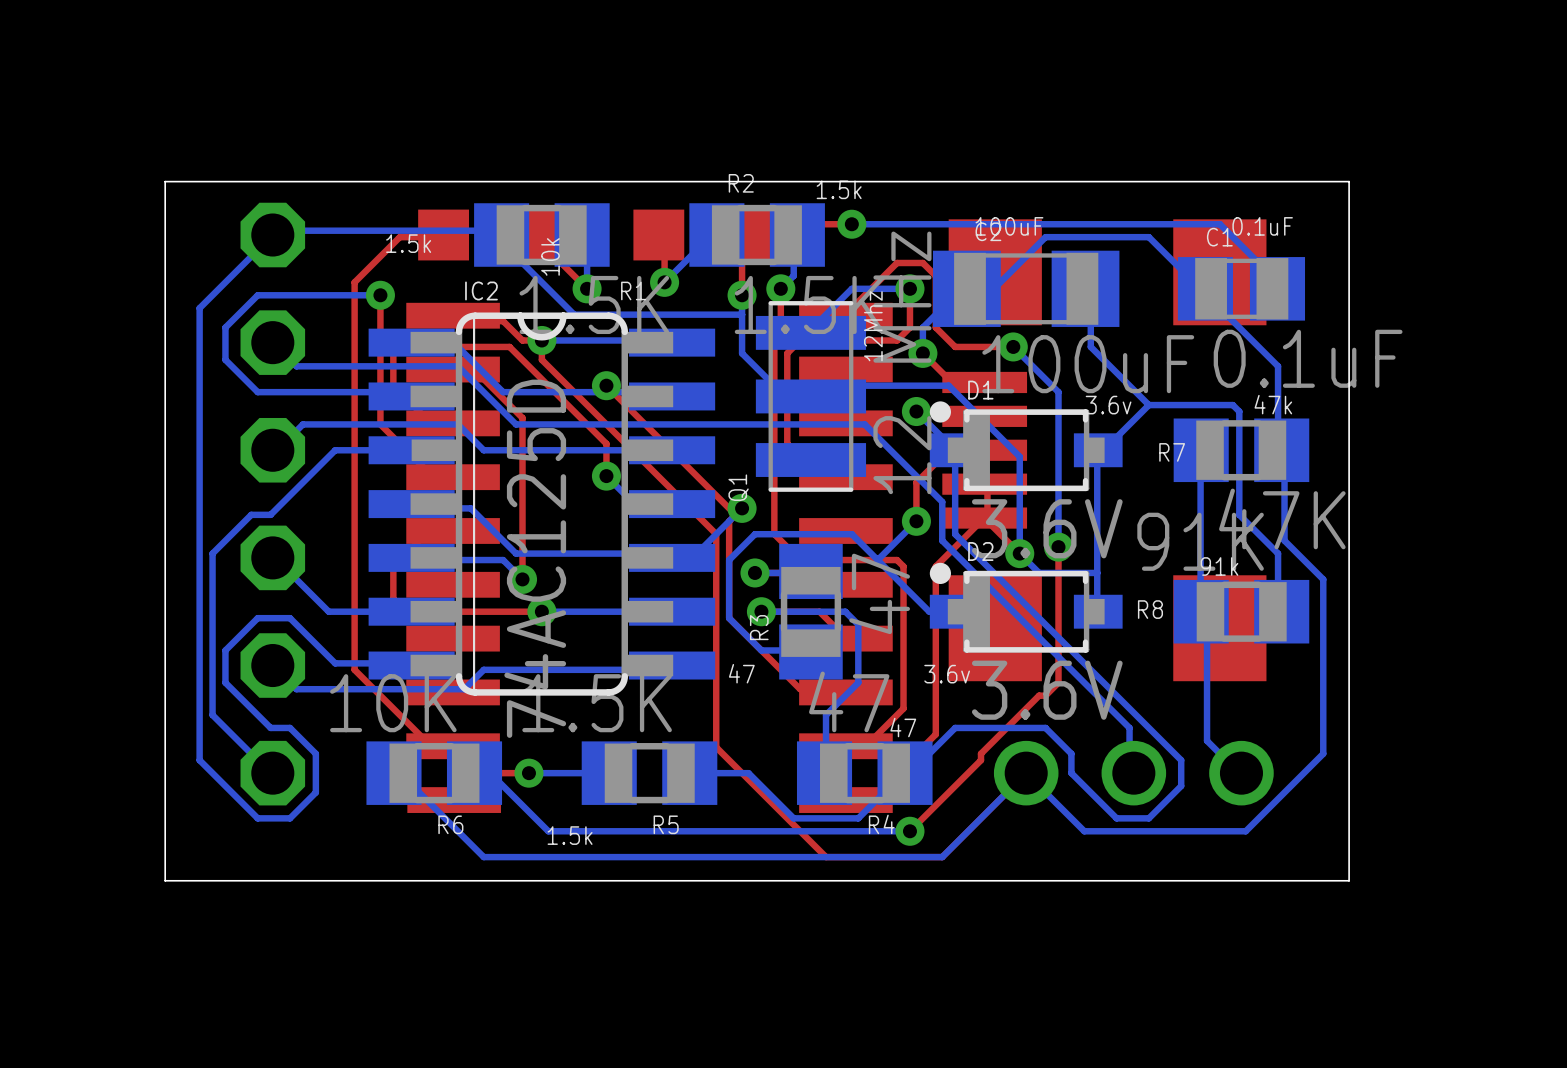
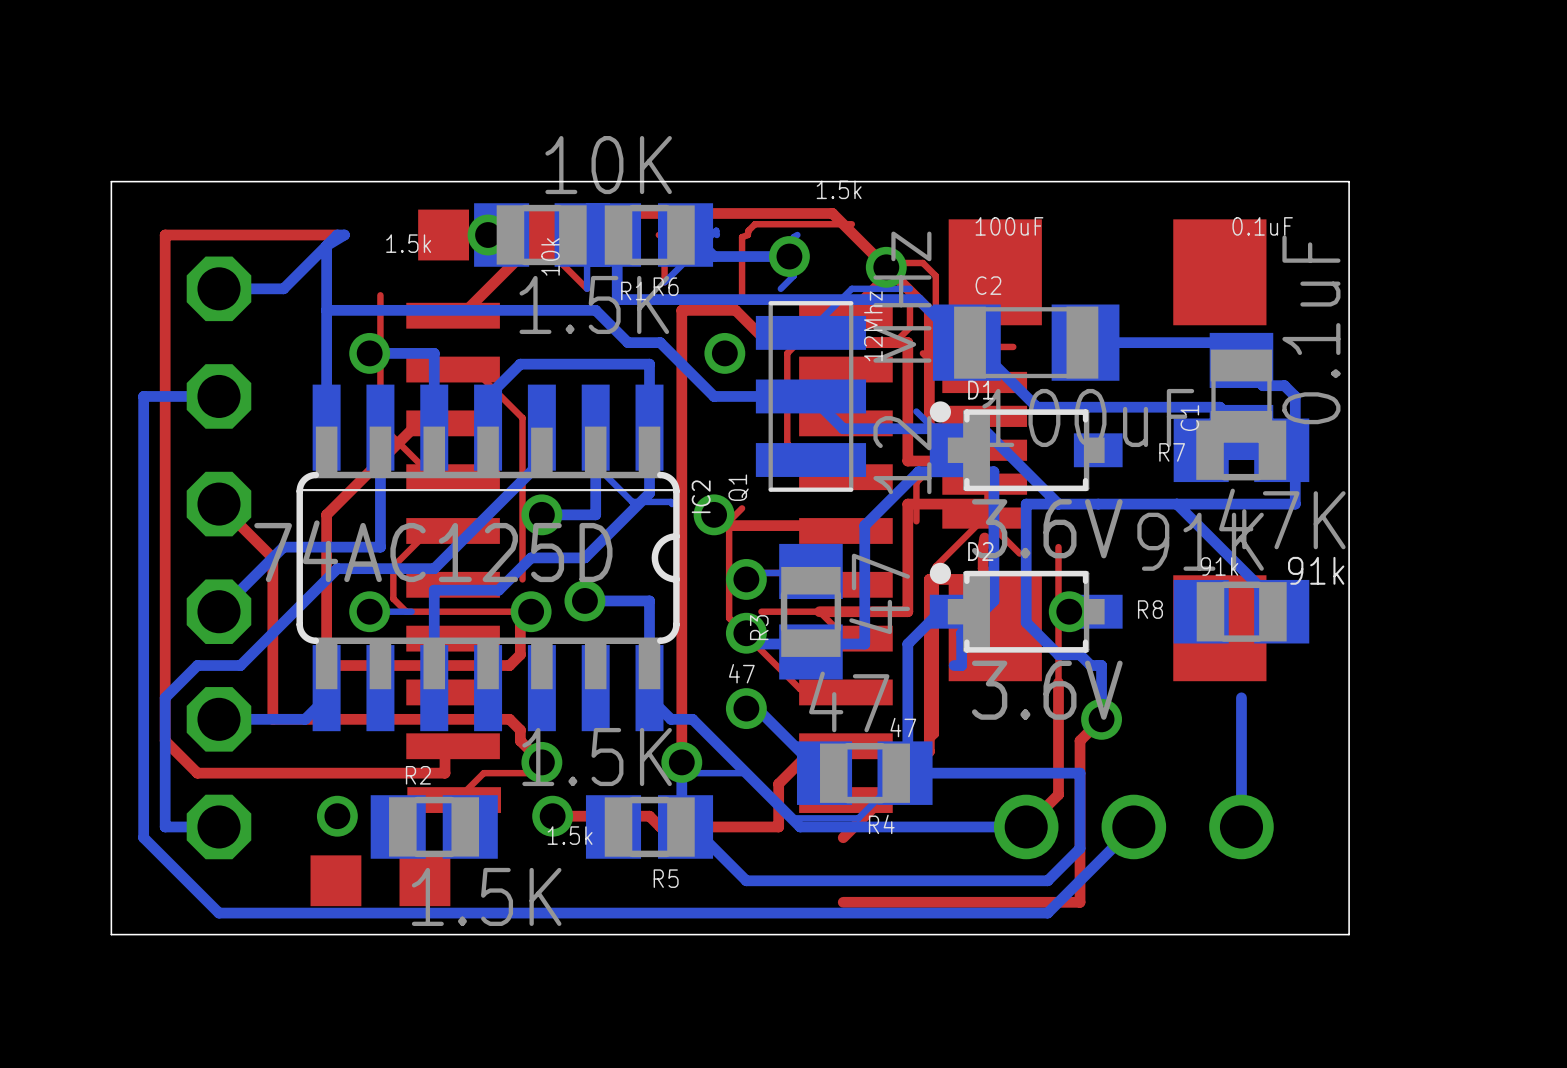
board edge: (165, 181) (165, 880) (1349, 880) -> (165, 181) (111, 181) (111, 934) (1349, 934) (1349, 880)
R2 footprint: [689, 203, 825, 267] -> [370, 795, 498, 859]
bottom track: (851, 224) (1219, 224) (1271, 275) (1271, 288) (1277, 288) -> none
via: (851, 224) -> none
top track: (443, 235) (438, 237) (399, 237) (354, 282) (354, 669) (425, 740) (451, 740) (453, 746) -> (335, 235) (165, 235) (165, 740) (197, 773) (445, 773) (445, 751) (453, 746)
via: none -> (488, 235)
bottom track: none -> (613, 235) (617, 235) (617, 299) (918, 299) (961, 342) (972, 342) (1036, 407) (1219, 407) (1241, 428) (1241, 432)
bottom track: none -> (685, 235) (692, 235) (714, 256) (789, 256)
part position: (703, 235) -> (380, 880)
via: (664, 282) -> none
bottom track: none -> (218, 288) (283, 288) (337, 235) (344, 235) (326, 245) (326, 427)
via: (587, 288) -> none
top track: (780, 288) (780, 340) (774, 346) (774, 534) (800, 560) (897, 560) (903, 566) (903, 708) (871, 740) (851, 740) (845, 746) -> (552, 816) (649, 816) (660, 826) (778, 826) (778, 783) (810, 751) (843, 751) (845, 746)
via position: (780, 288) -> (789, 256)
via position: (909, 288) -> (886, 267)
C2 position: (1026, 288) -> (1026, 342)
bottom track: (1085, 288) (1090, 288) (1090, 346) (1148, 405) -> none
C1 rotation: 0° (1241, 288) -> 90° clockwise (1241, 396)
C1 position: (1241, 288) -> (1241, 396)
bottom track: (380, 295) (257, 295) (225, 327) (225, 359) (257, 392) (406, 392) (411, 396) -> none
via: (380, 295) -> none
bottom track: (742, 295) (742, 353) (780, 392) (806, 392) (810, 396) (819, 385) (948, 385) (1019, 456) (1019, 553) (1039, 572) (1097, 572) -> none
via: (742, 295) -> none
bottom track: none -> (326, 310) (595, 310) (627, 342) (660, 342) (714, 396) (810, 396) (843, 428) (983, 428) (1058, 504)
bottom track: (742, 314) (574, 314) (496, 237) (501, 235) (496, 230) (277, 230) (199, 308) (199, 760) (257, 818) (290, 818) (315, 792) (315, 753) (290, 727) (270, 727) (225, 682) (225, 650) (257, 618) (290, 618) (335, 663) (406, 663) (411, 665) -> none
top track: (453, 315) (457, 321) (503, 321) (522, 340) (541, 340) (541, 359) (716, 534) (716, 747) (826, 857) (942, 857) (1026, 773) -> (453, 315) (455, 321) (531, 245) (531, 213) (832, 213) (929, 310) (929, 428) (983, 428) (984, 436)
bottom track: (541, 340) (671, 340) (672, 342) -> none
via: (541, 340) -> none
bottom track: (272, 342) (296, 366) (457, 366) (516, 424) (864, 424) (942, 501) (942, 540) (1129, 727) (1129, 773) (1133, 773) -> none
bottom track: (411, 342) (412, 346) (457, 346) (503, 392) (671, 392) (672, 396) -> none
bottom track: none -> (1085, 342) (1230, 342) (1241, 353) (1241, 364) (1262, 385) (1284, 385) (1295, 396) (1295, 504) (1026, 504) (1026, 622) (1058, 654) (1080, 654) (1090, 665) (1101, 665) (1101, 719)
bottom track: (1013, 346) (1058, 392) (1058, 547) -> none
via: (1013, 346) -> none
bottom track: none -> (369, 353) (434, 353) (434, 427)
via: none -> (369, 353)
via: none -> (724, 353)
bottom track: (922, 353) (922, 327) (961, 288) (993, 288) (1045, 237) (1148, 237) (1278, 366) (1278, 450) (1284, 450) (1284, 540) (1323, 579) (1323, 753) (1245, 831) (1084, 831) (1026, 773) (942, 857) (483, 857) (399, 773) (394, 773) -> none
via: (922, 353) -> none
C1 value position: 0.1uF (1308, 358) -> 0.1uF (1311, 329)
top track: (606, 385) (735, 514) -> none
via: (606, 385) -> none
bottom track: none -> (218, 396) (143, 396) (143, 837) (218, 913) (1047, 913) (1133, 826)
text: 47k (1273, 404) -> none
text: 3.6v (1108, 405) -> none
bottom track: (1148, 405) (1232, 405) (1239, 411) (1239, 514) (1278, 553) (1278, 611) (1281, 611) -> none
bottom track: (1148, 405) (1103, 450) (1097, 450) (1097, 611) -> none
via: (916, 411) -> none
top track: (453, 423) (451, 417) (425, 417) (393, 385) (393, 353) (399, 346) (509, 346) (606, 443) (606, 476) -> (453, 423) (445, 428) (412, 428) (326, 514) (326, 665) (509, 665) (520, 654) (520, 622) (531, 611)
bottom track: none -> (380, 427) (380, 547) (283, 547) (218, 611)
bottom track: none -> (488, 427) (488, 396) (520, 364) (649, 364) (649, 493) (584, 557) (531, 557) (498, 590) (434, 590) (434, 688)
bottom track: none -> (541, 427) (541, 471) (531, 471) (434, 568) (337, 568) (240, 665) (197, 665) (165, 697) (165, 826) (218, 826)
bottom track: none -> (595, 427) (595, 514) (541, 514)
bottom track: (411, 450) (335, 450) (270, 514) (251, 514) (212, 553) (212, 715) (272, 773) -> none
bottom track: (672, 450) (483, 450) (457, 424) (302, 424) (277, 450) (272, 450) -> none
bottom track: (954, 450) (955, 534) (1181, 760) (1181, 786) (1148, 818) (1116, 818) (1071, 773) (1071, 753) (1045, 727) (955, 727) (909, 773) -> (681, 762) (681, 826) (692, 826) (746, 880) (1047, 880) (1080, 848) (1080, 773) (909, 773)
bottom track: (1200, 450) (1200, 611) (1207, 611) (1207, 740) (1241, 773) -> none
top track: none -> (984, 470) (983, 461) (907, 461) (907, 342) (767, 342) (735, 310) (681, 310) (681, 762)
via: (606, 476) -> none
top track: none -> (218, 504) (272, 557) (272, 719) (509, 719) (520, 730) (520, 740) (541, 762)
part position: (272, 504) -> (218, 557)
bottom track: (411, 504) (412, 508) (470, 508) (516, 553) (671, 553) (672, 557) (677, 553) (696, 553) (742, 508) -> none
IC2 rotation: 0° (541, 504) -> 90° clockwise (488, 557)
top track: none -> (984, 504) (907, 504) (907, 611) (819, 611)
bottom track: none -> (1176, 504) (1295, 622) (1295, 629)
via position: (742, 508) -> (714, 514)
via: none -> (541, 514)
top track: none -> (714, 514) (714, 525) (843, 525) (845, 530)
bottom track: (916, 521) (877, 560) -> none
via: (916, 521) -> none
top track: none -> (984, 537) (983, 579) (929, 579) (929, 751) (843, 837)
via: (1058, 547) -> none
via: (1019, 553) -> none
bottom track: (272, 557) (328, 611) (369, 611) -> none
bottom track: (411, 557) (412, 560) (503, 560) (522, 579) -> none
via size: [740, 558, 770, 588] -> [725, 558, 767, 600]
text: none -> 91k (1316, 570)
via: (522, 579) -> none
via size: [527, 597, 557, 627] -> [510, 591, 552, 633]
bottom track: none -> (584, 600) (649, 600) (649, 697) (671, 719) (692, 719) (800, 826) (1026, 826)
via: none -> (584, 600)
via: none -> (369, 611)
bottom track: (672, 611) (541, 611) -> none
bottom track: (761, 611) (845, 611) (858, 624) (858, 682) (826, 715) (826, 773) -> (746, 708) (757, 708) (821, 773) (826, 773)
via: (761, 611) -> none
bottom track: (940, 611) (929, 611) (851, 534) (754, 534) (729, 560) (729, 618) (761, 650) (810, 651) -> (940, 611) (907, 644) (907, 773)
via: none -> (1069, 611)
bottom track: none -> (746, 633) (757, 644) (864, 644) (864, 525) (918, 471) (993, 471) (993, 600) (961, 633) (961, 665) (954, 665)
via: none -> (746, 633)
bottom track: (672, 665) (671, 669) (483, 669) (464, 689) (296, 689) (272, 665) -> none
text: 3.6v (947, 674) -> none
top track: (1058, 682) (1045, 695) (1039, 695) (981, 753) (981, 760) (909, 831) -> (1058, 682) (1058, 794) (1026, 826)
bottom track: none -> (326, 688) (326, 697) (305, 719) (218, 719)
bottom track: none -> (1241, 697) (1241, 826)
via: none -> (746, 708)
top track: none -> (1101, 719) (1080, 740) (1080, 902) (843, 902)
via: none -> (1101, 719)
R6 footprint: [366, 741, 503, 805] -> [585, 203, 714, 267]
R5 footprint: [581, 741, 718, 805] -> [585, 795, 714, 859]
via size: [514, 758, 544, 788] -> [521, 741, 563, 783]
via: none -> (681, 762)
bottom track: (474, 773) (490, 773) (548, 831) (909, 831) -> none
bottom track: (609, 773) (528, 773) -> none
part position: (1133, 773) -> (1133, 826)
via: none -> (337, 816)
via: none -> (552, 816)
via: (909, 831) -> none

